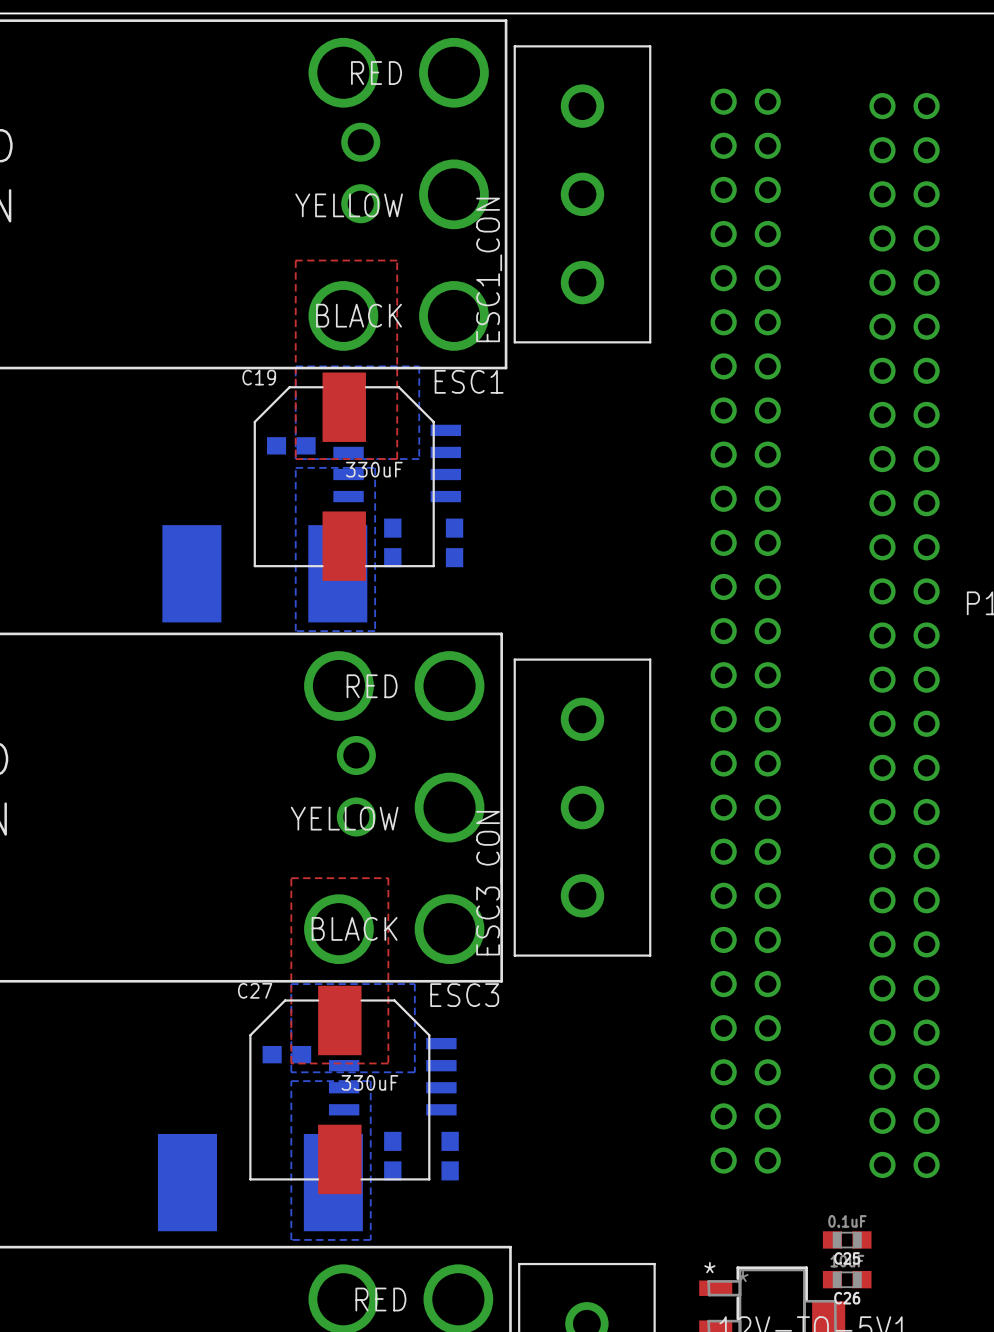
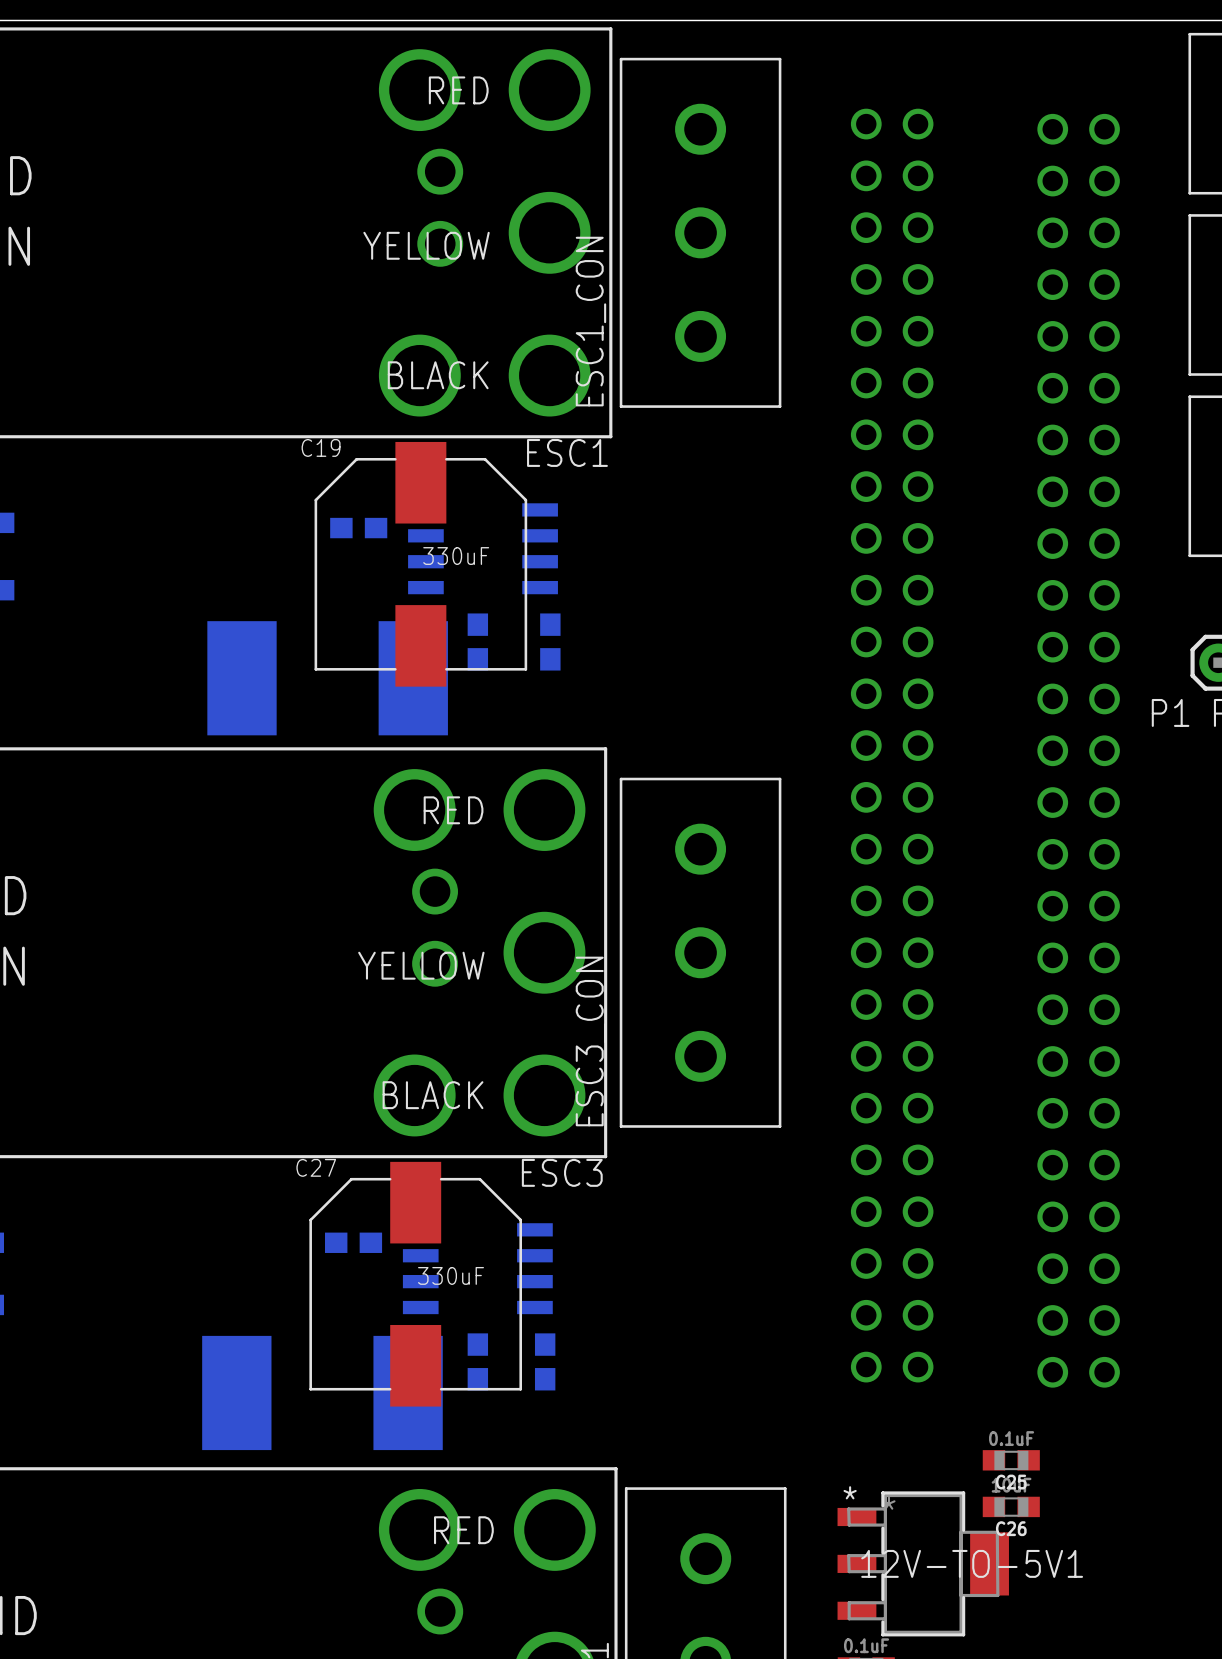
top zone outline: (295, 260) (397, 260) (397, 459) (295, 459) (295, 260) -> none
bottom zone outline: (295, 366) (295, 459) (419, 459) (419, 366) (295, 366) -> none
bottom zone outline: (295, 467) (295, 631) (375, 631) (375, 467) (295, 467) -> none
top zone outline: (291, 878) (388, 878) (388, 1063) (291, 1063) (291, 878) -> none
bottom zone outline: (291, 984) (291, 1072) (414, 1072) (414, 984) (291, 984) -> none
bottom zone outline: (291, 1081) (291, 1239) (370, 1239) (370, 1081) (291, 1081) -> none

